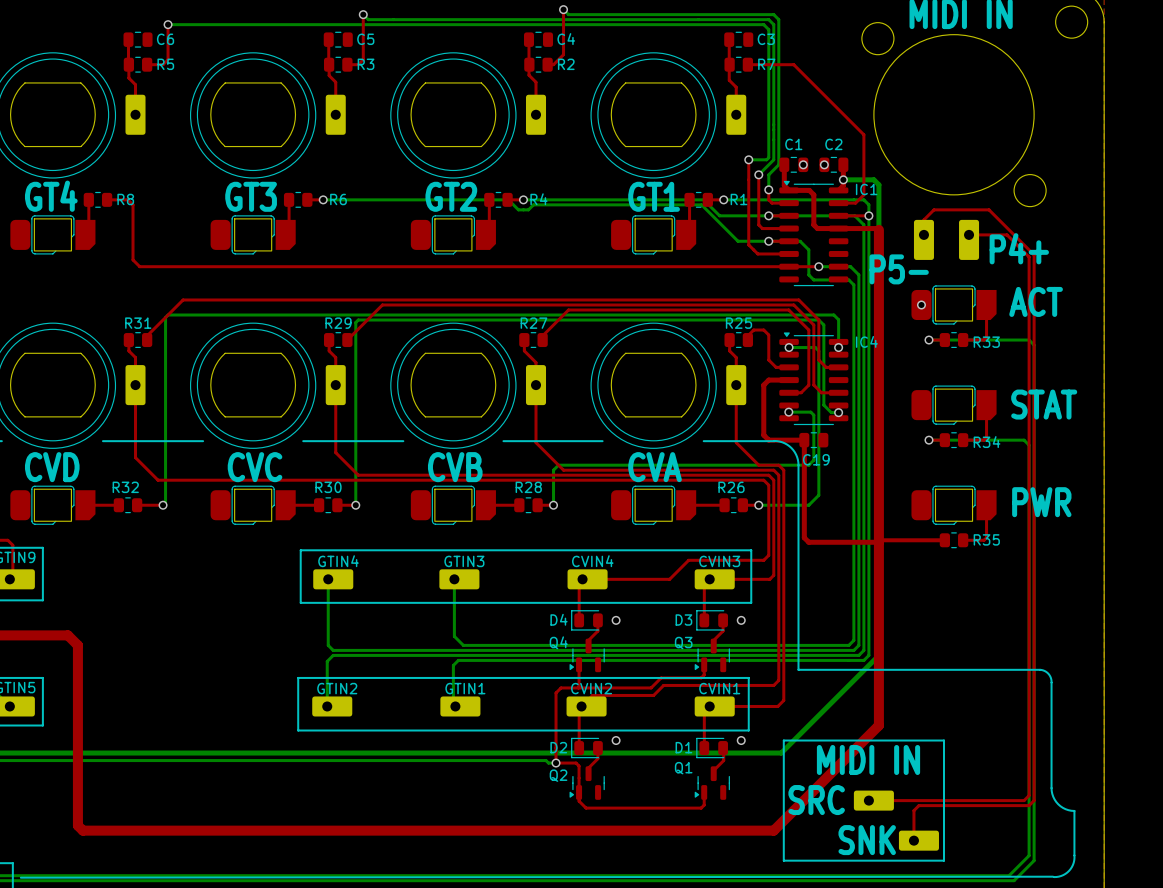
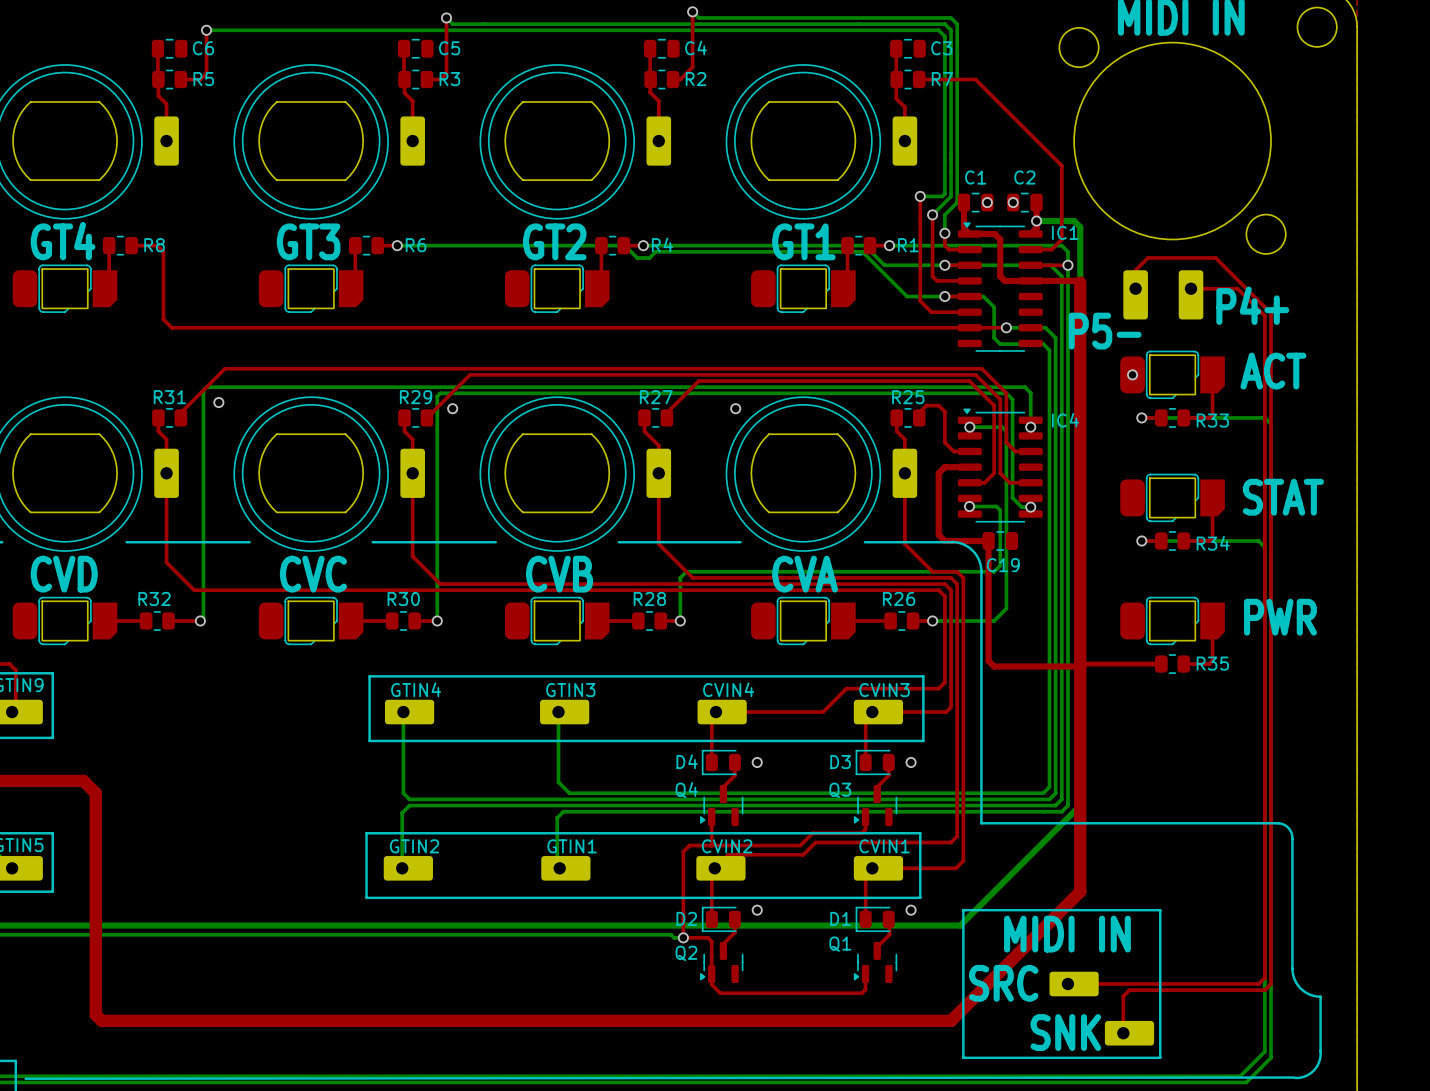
via: none -> (218, 402)
via: none -> (452, 408)
via: none -> (735, 408)

